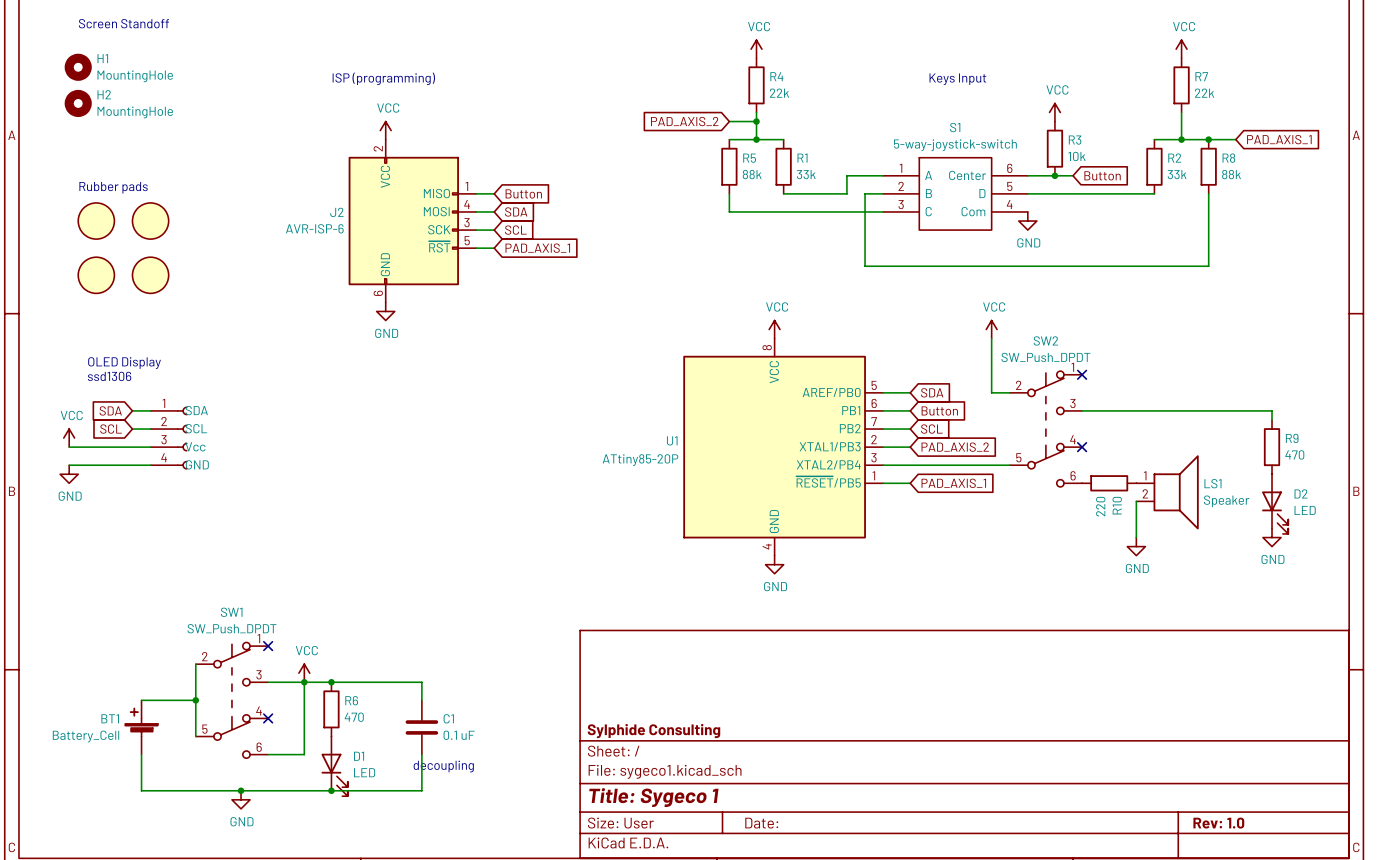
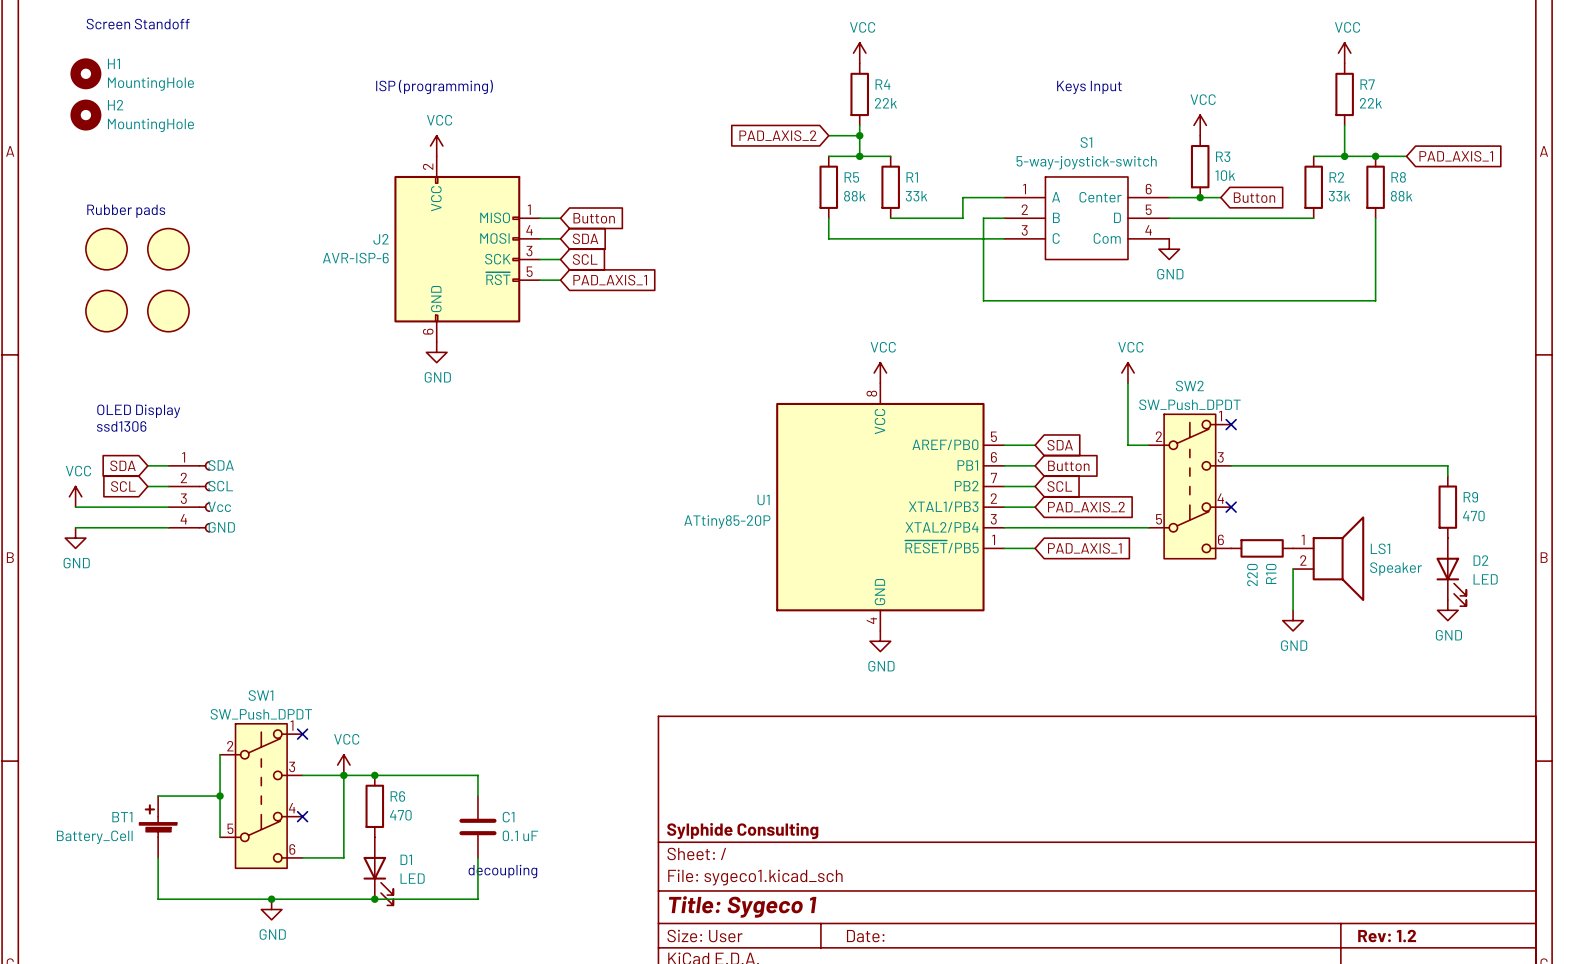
SW2 symbol: [1009, 371, 1083, 487] -> [1148, 414, 1232, 559]
SW1 symbol: [195, 642, 269, 759] -> [220, 723, 303, 869]
title block: Rev: 1.0 (1218, 823) -> Rev: 1.2 (1387, 936)

